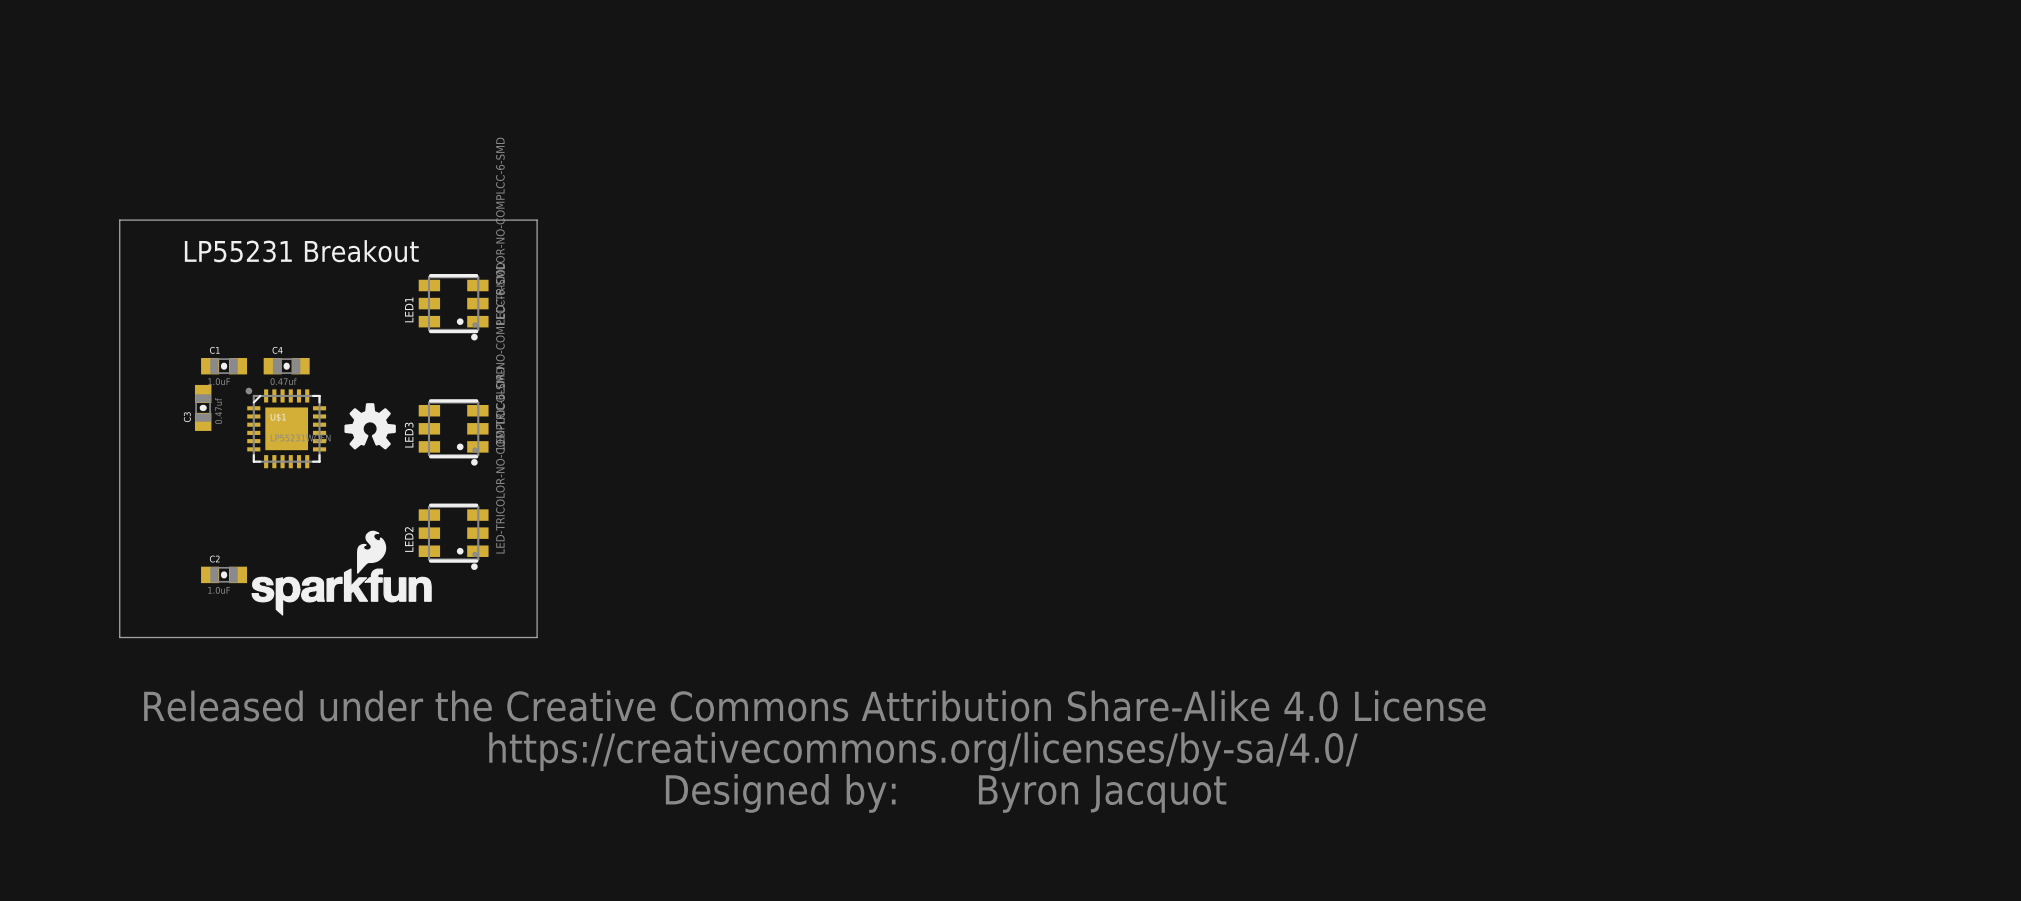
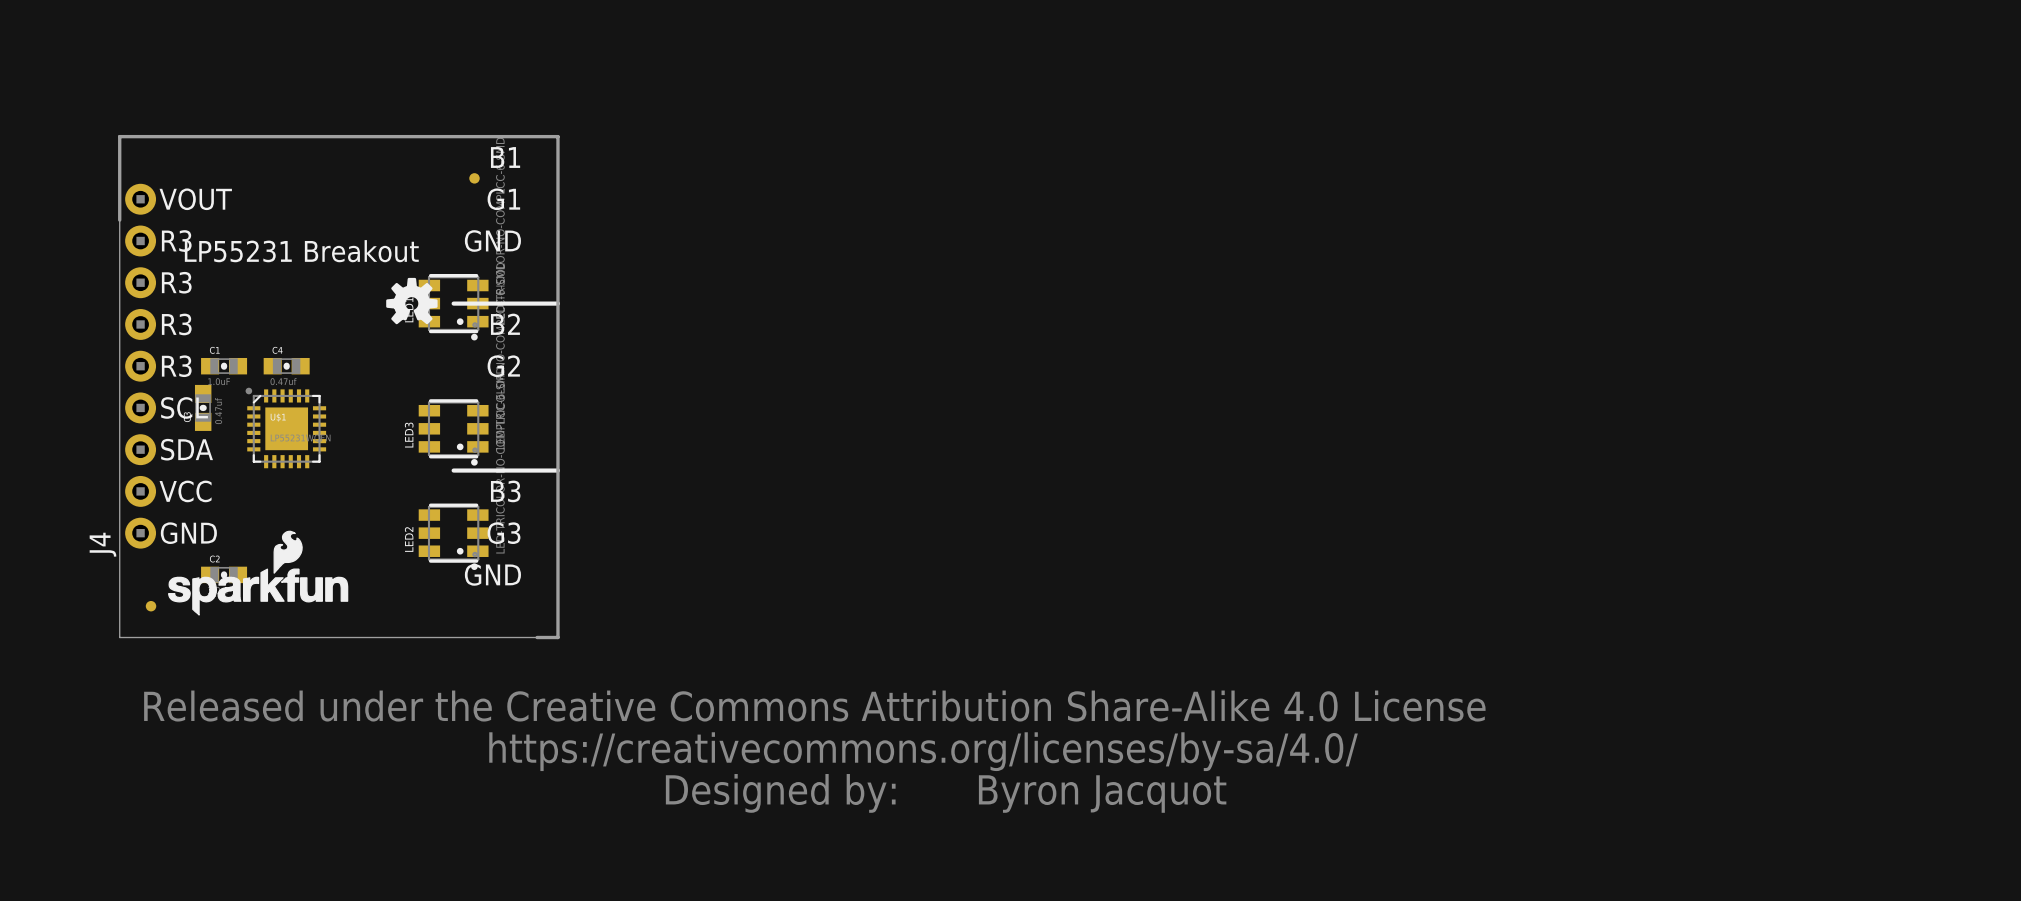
text: none -> B1 (505, 157)
part: none -> (474, 178)
text: none -> VOUT (195, 199)
text: none -> G1 (503, 199)
board edge: (119, 220) (537, 220) (537, 637) -> (119, 220) (119, 136) (557, 136) (557, 637) (537, 637)
text: none -> R3 (176, 241)
text: none -> GND (492, 241)
text: none -> R3 (176, 282)
line: none -> (453, 303) (557, 303)
text: none -> R3 (176, 324)
text: none -> B2 (505, 324)
J4: none -> (140, 366)
text: none -> R3 (176, 366)
text: none -> G2 (503, 366)
text: none -> SCL (184, 407)
drawing position: (370, 426) -> (411, 301)
text: none -> SDA (187, 449)
line: none -> (453, 470) (557, 470)
text: none -> VCC (185, 491)
text: none -> B3 (505, 491)
text: none -> GND (188, 533)
text: none -> G3 (504, 533)
drawing position: (341, 573) -> (258, 573)
text: none -> GND (492, 574)
part: none -> (151, 606)

